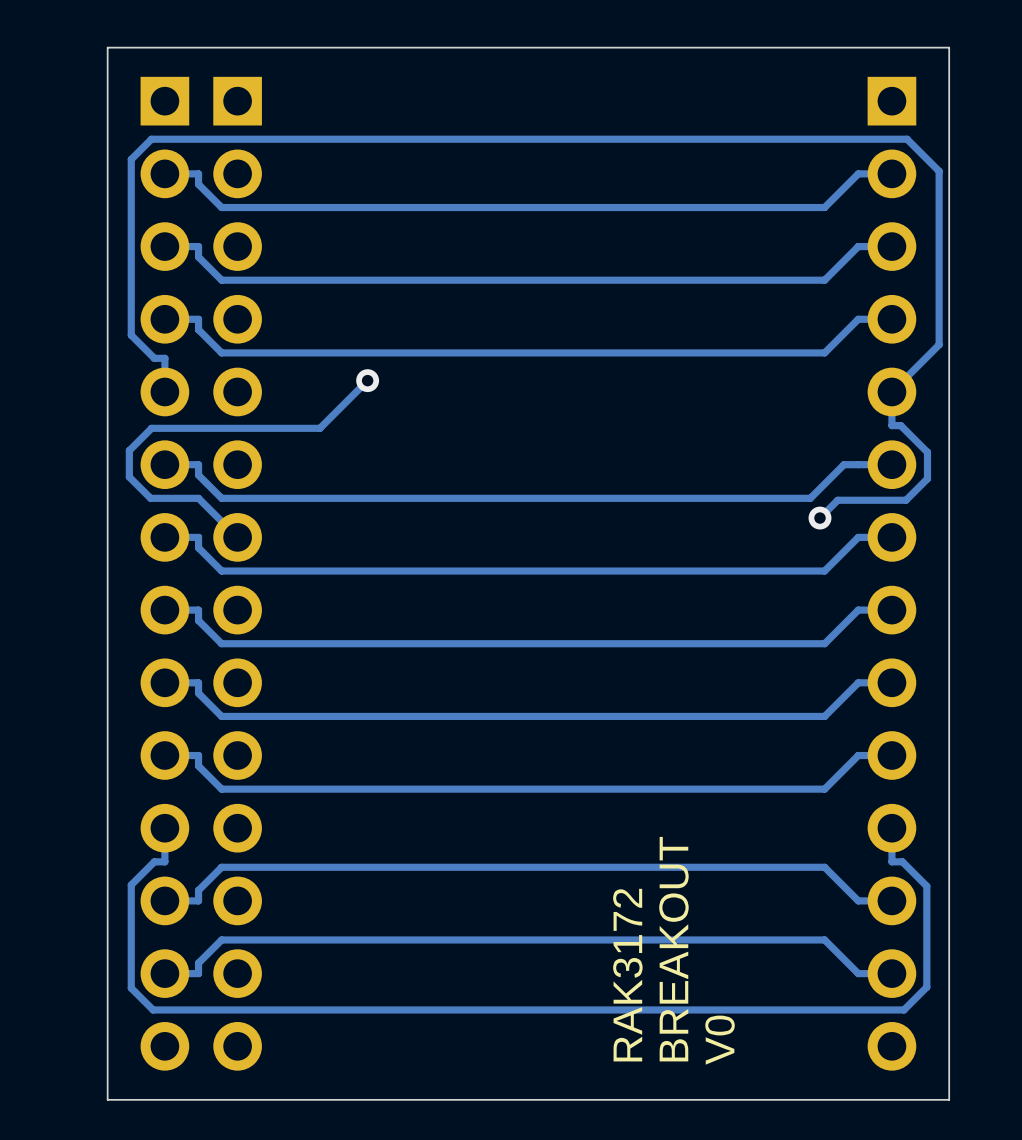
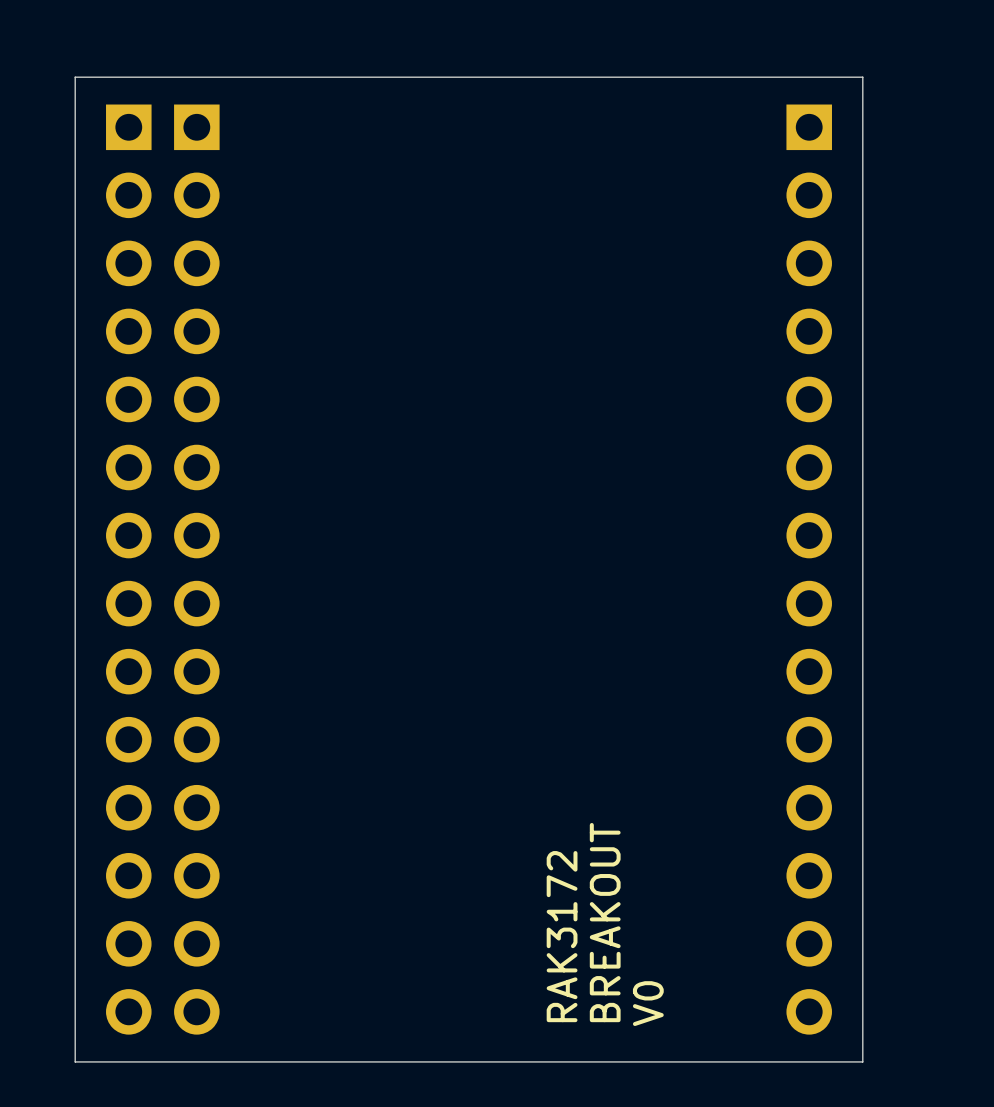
track: (891, 173) (858, 173) (824, 207) (221, 207) (198, 184) (198, 173) (164, 173) -> none
track: (891, 246) (858, 246) (824, 280) (221, 280) (198, 257) (198, 246) (164, 246) -> none
track: (891, 319) (858, 319) (824, 352) (221, 352) (198, 329) (198, 319) (164, 319) -> none
track: (367, 380) (319, 428) (151, 428) (129, 450) (129, 477) (150, 498) (198, 498) (237, 537) -> none
via: (367, 380) -> none
track: (164, 391) (164, 358) (154, 358) (131, 335) (131, 159) (151, 139) (907, 139) (939, 171) (939, 344) (891, 391) (891, 425) (900, 425) (927, 452) (927, 478) (906, 500) (837, 500) (819, 518) -> none
track: (891, 464) (844, 464) (810, 498) (221, 498) (198, 475) (198, 464) (164, 464) -> none
via: (819, 518) -> none
track: (891, 537) (858, 537) (824, 571) (221, 571) (198, 547) (198, 537) (164, 537) -> none
track: (891, 610) (858, 610) (824, 643) (221, 643) (198, 620) (198, 610) (164, 610) -> none
track: (891, 682) (858, 682) (824, 716) (221, 716) (198, 693) (198, 682) (164, 682) -> none
track: (891, 755) (858, 755) (824, 789) (221, 789) (198, 766) (198, 755) (164, 755) -> none
track: (891, 828) (891, 861) (902, 861) (926, 886) (926, 987) (903, 1009) (153, 1009) (131, 988) (131, 884) (154, 861) (164, 861) (164, 828) -> none
track: (891, 900) (858, 900) (824, 867) (221, 867) (198, 890) (198, 900) (164, 900) -> none
track: (891, 973) (858, 973) (824, 939) (221, 939) (198, 963) (198, 973) (164, 973) -> none

